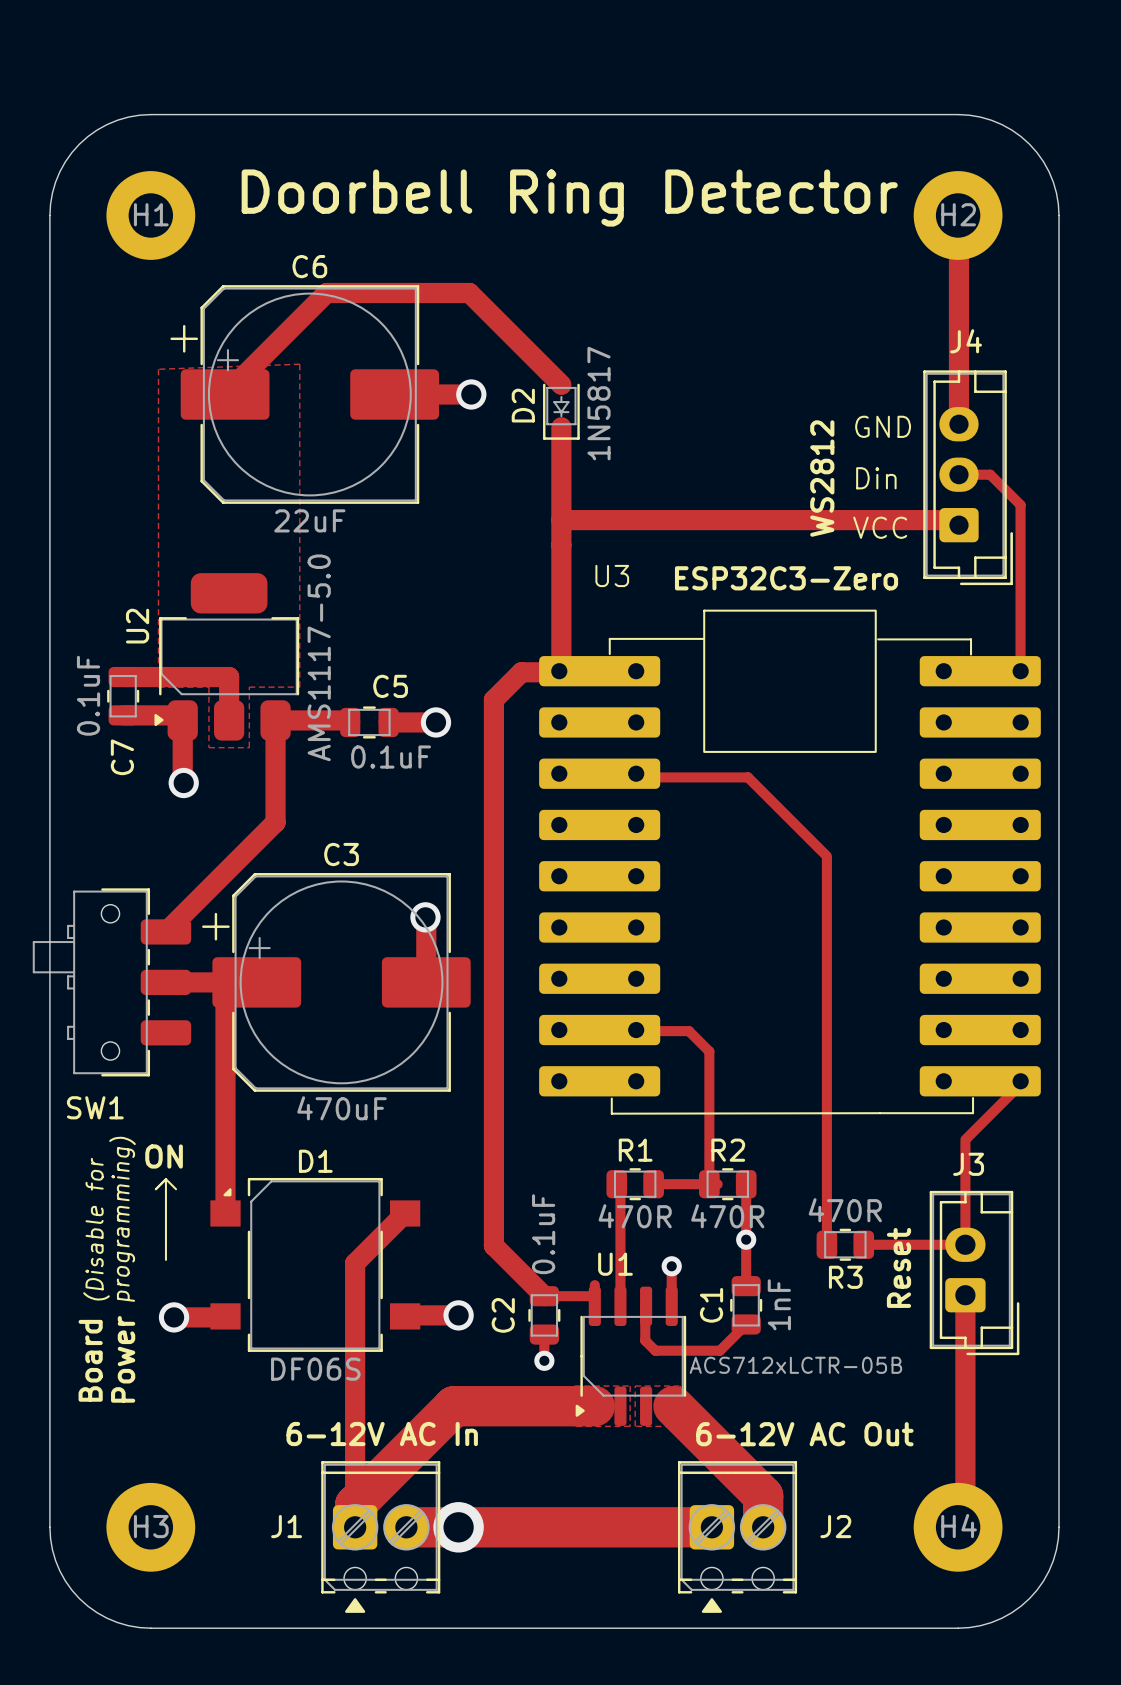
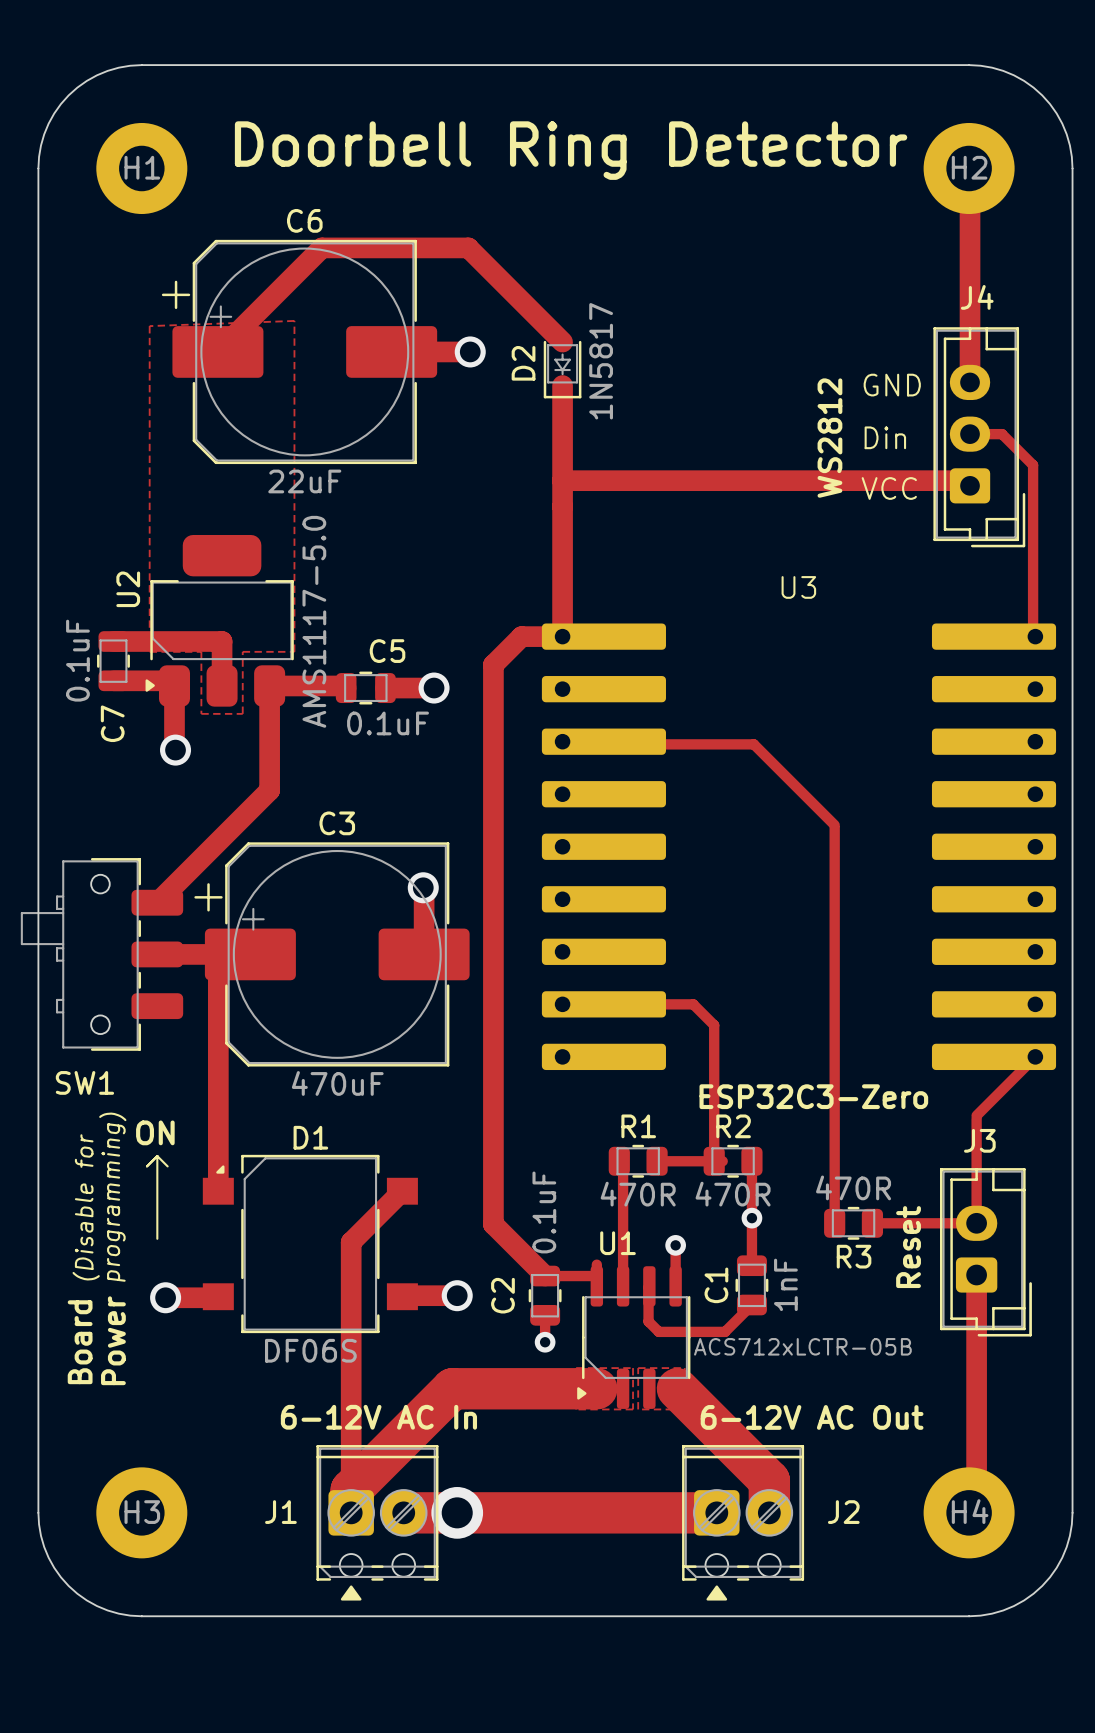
U3 name position: U3 (612, 575) -> U3 (798, 587)
text: ESP32C3-Zero (786, 578) -> none
U3 footprint: [539, 609, 1041, 1115] -> [541, 623, 1057, 1071]
text: none -> ESP32C3-Zero (813, 1096)

